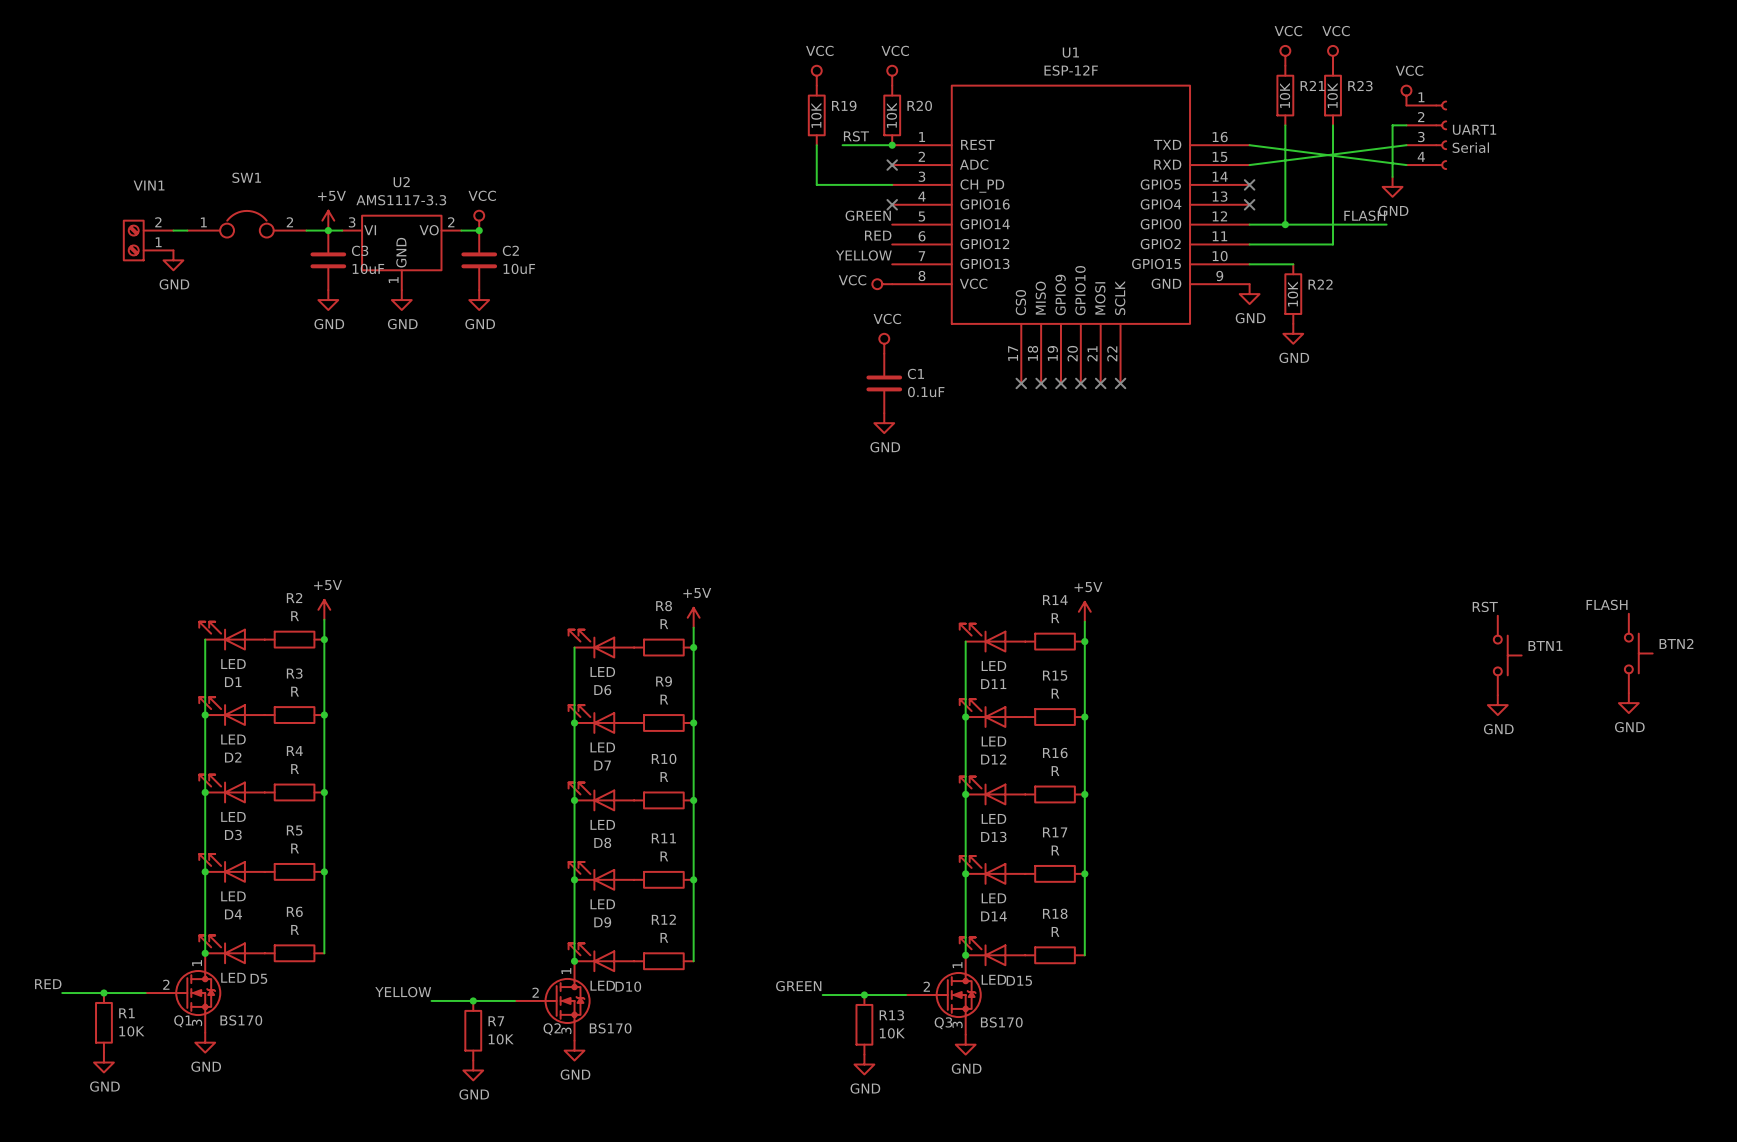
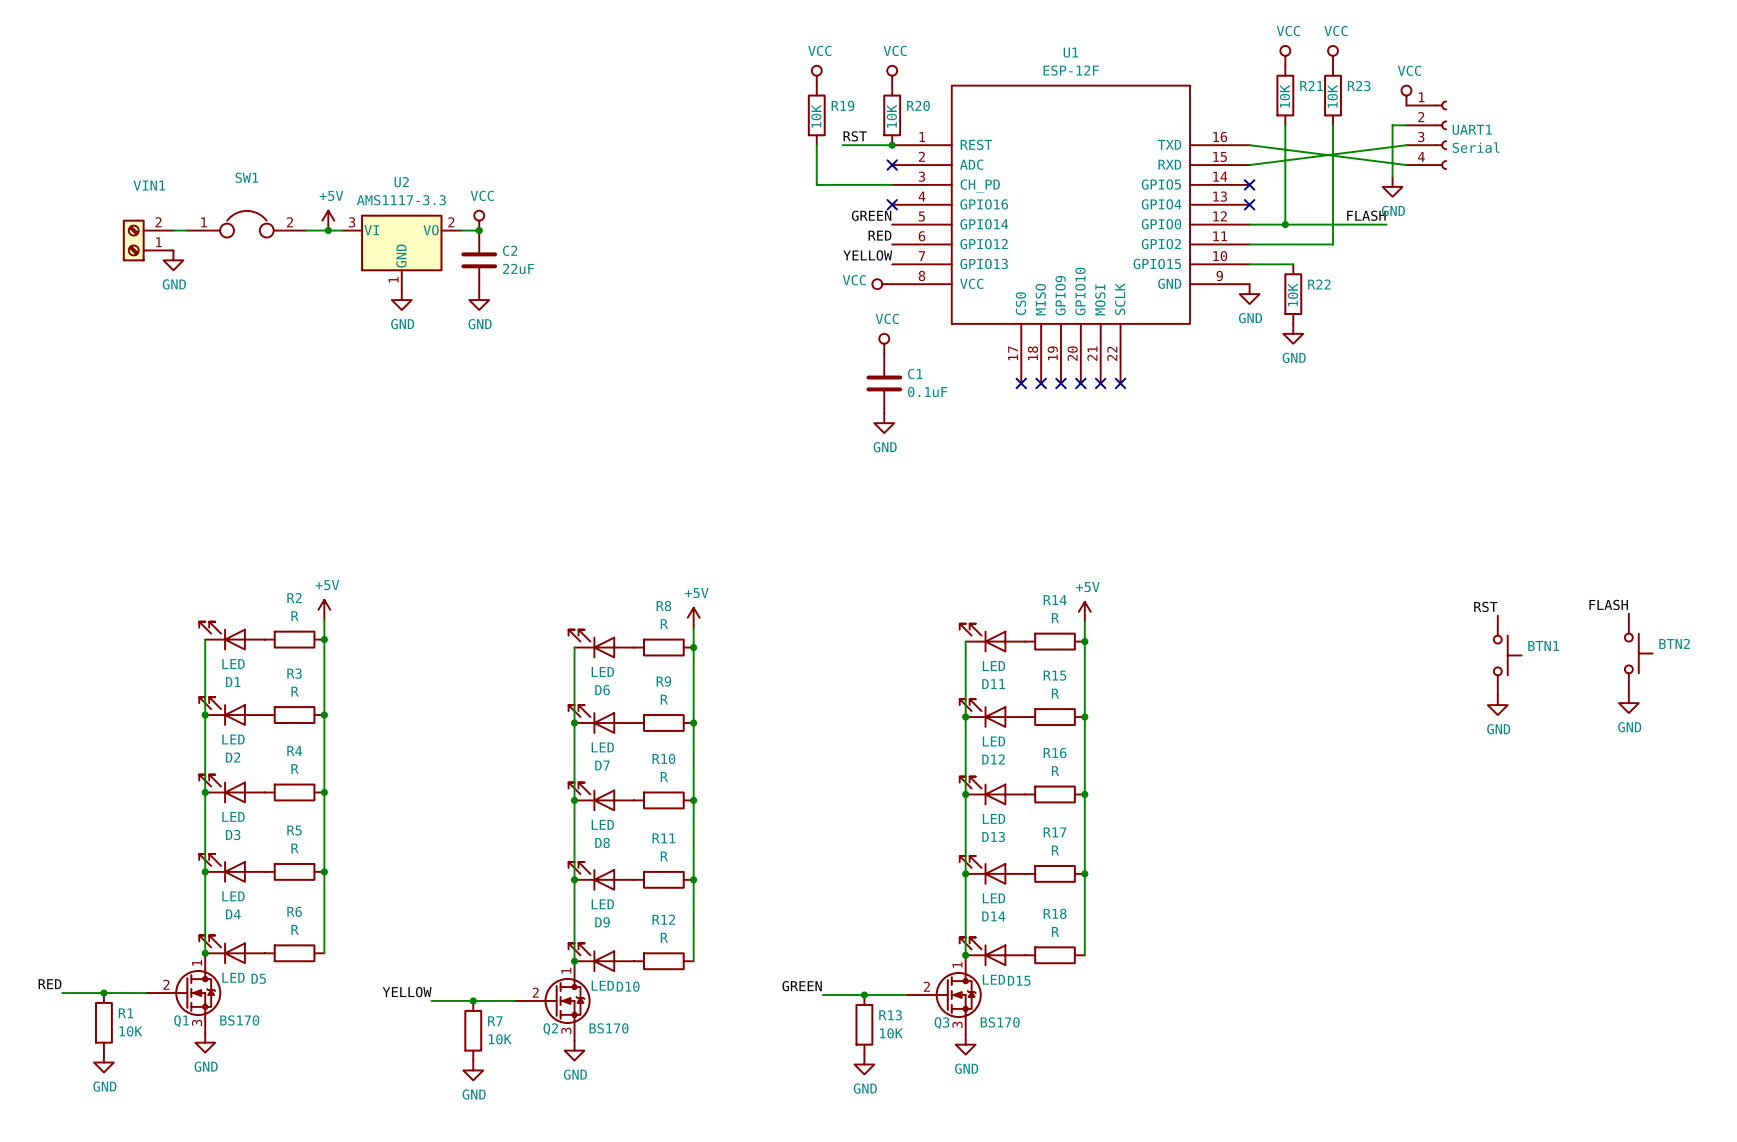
C3: 10uF (328, 260) -> none
C2 value: 10uF (519, 268) -> 22uF (518, 268)
power symbol: GND (328, 300) -> none

